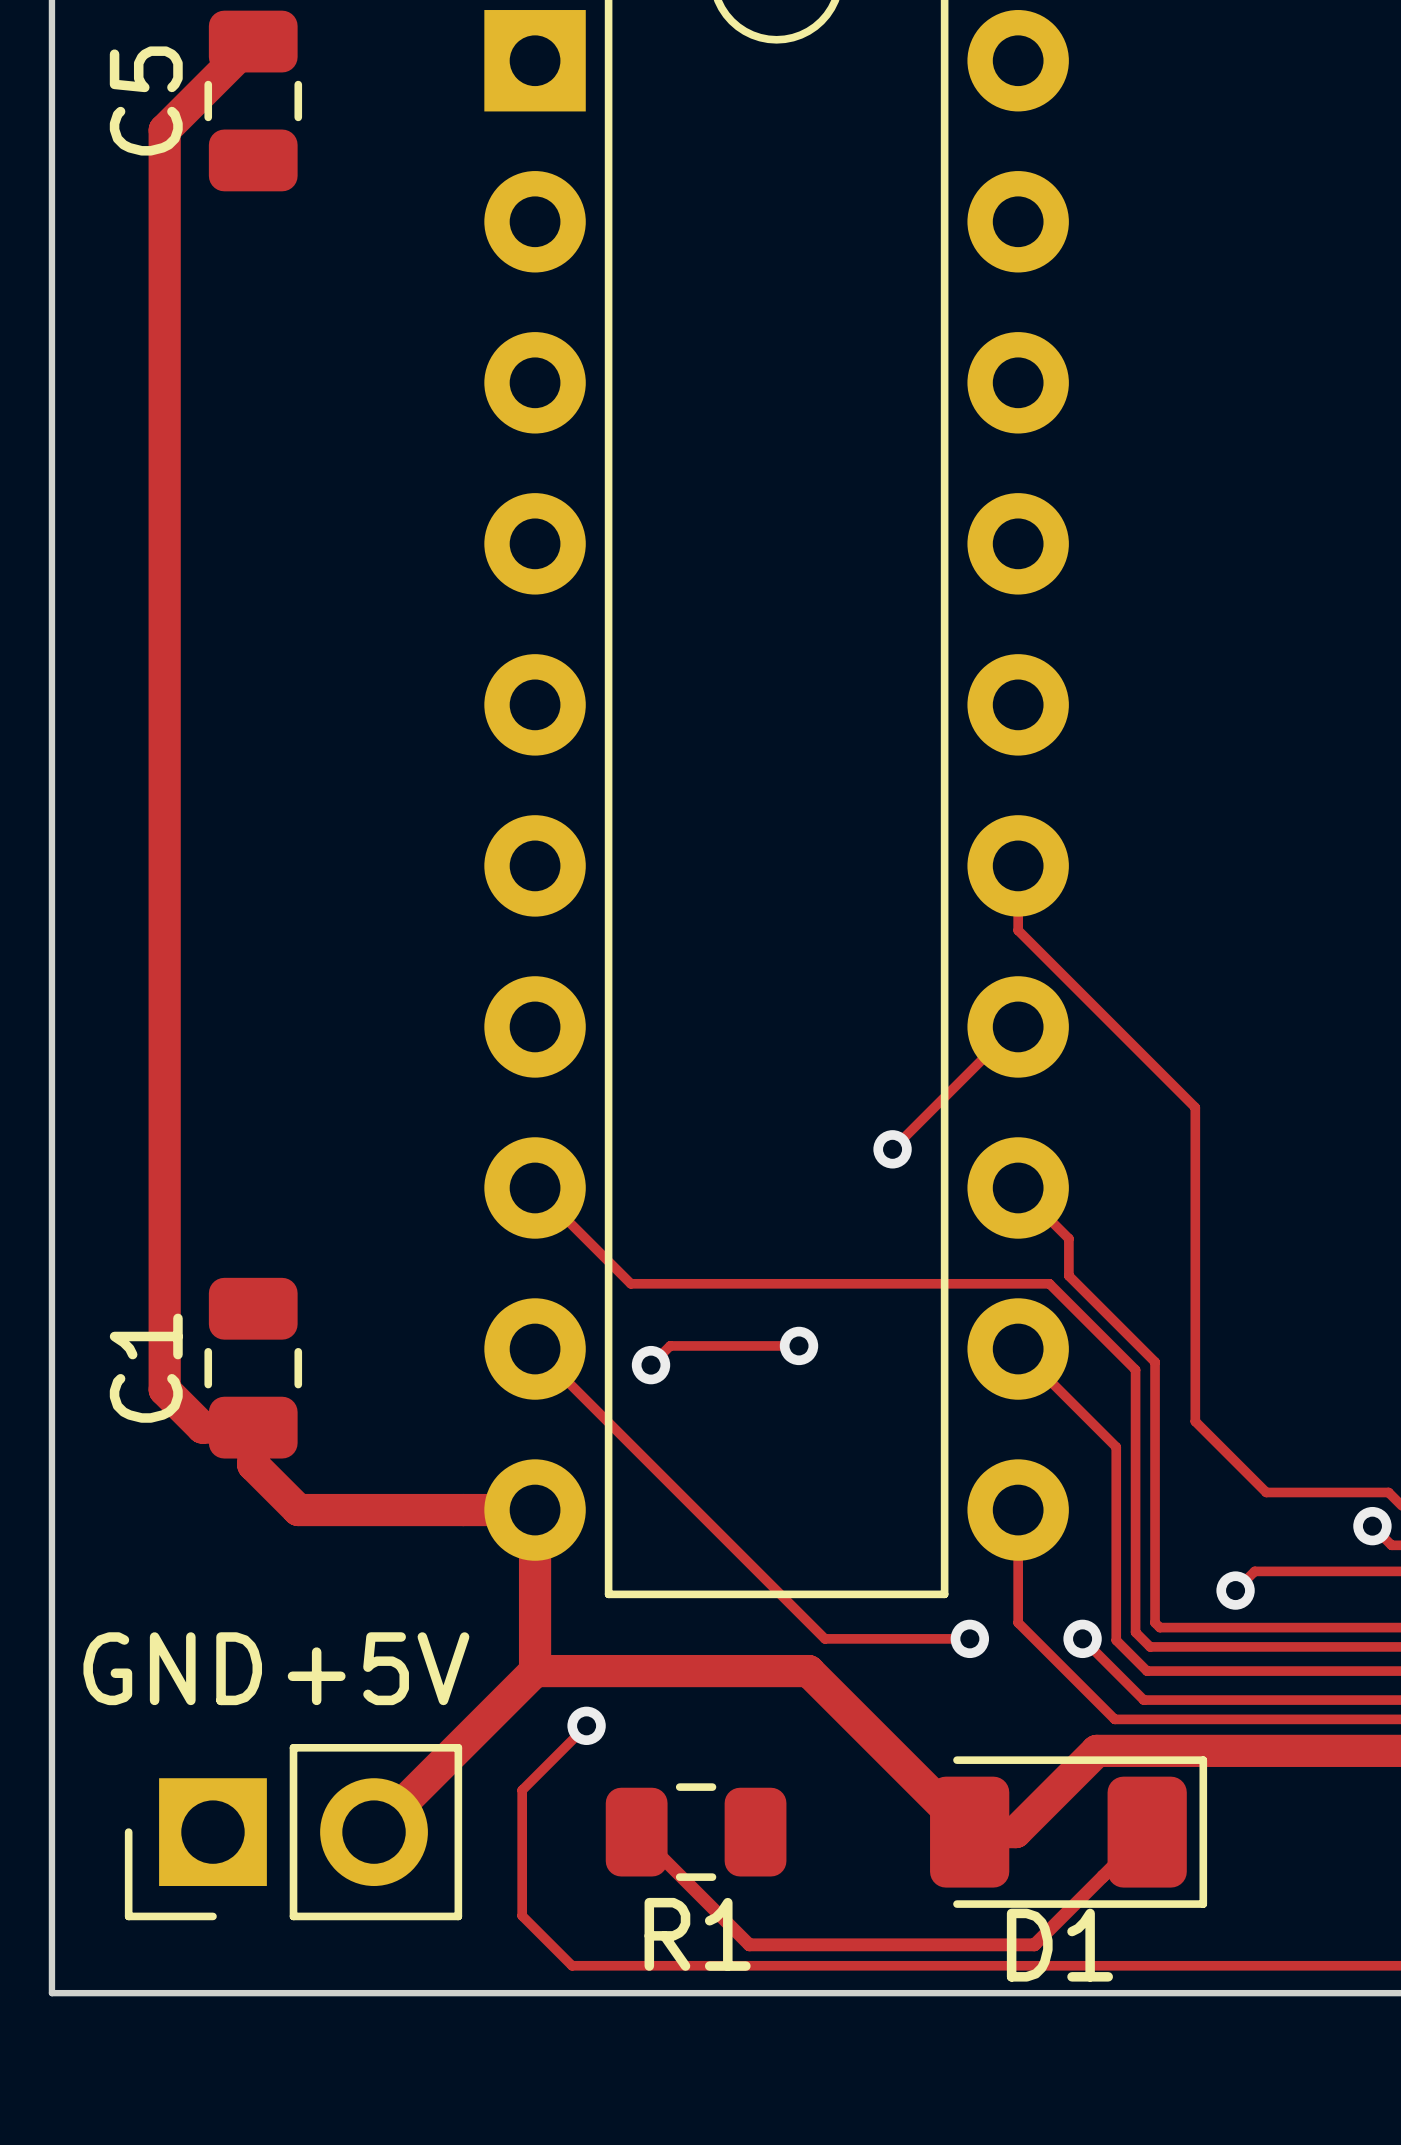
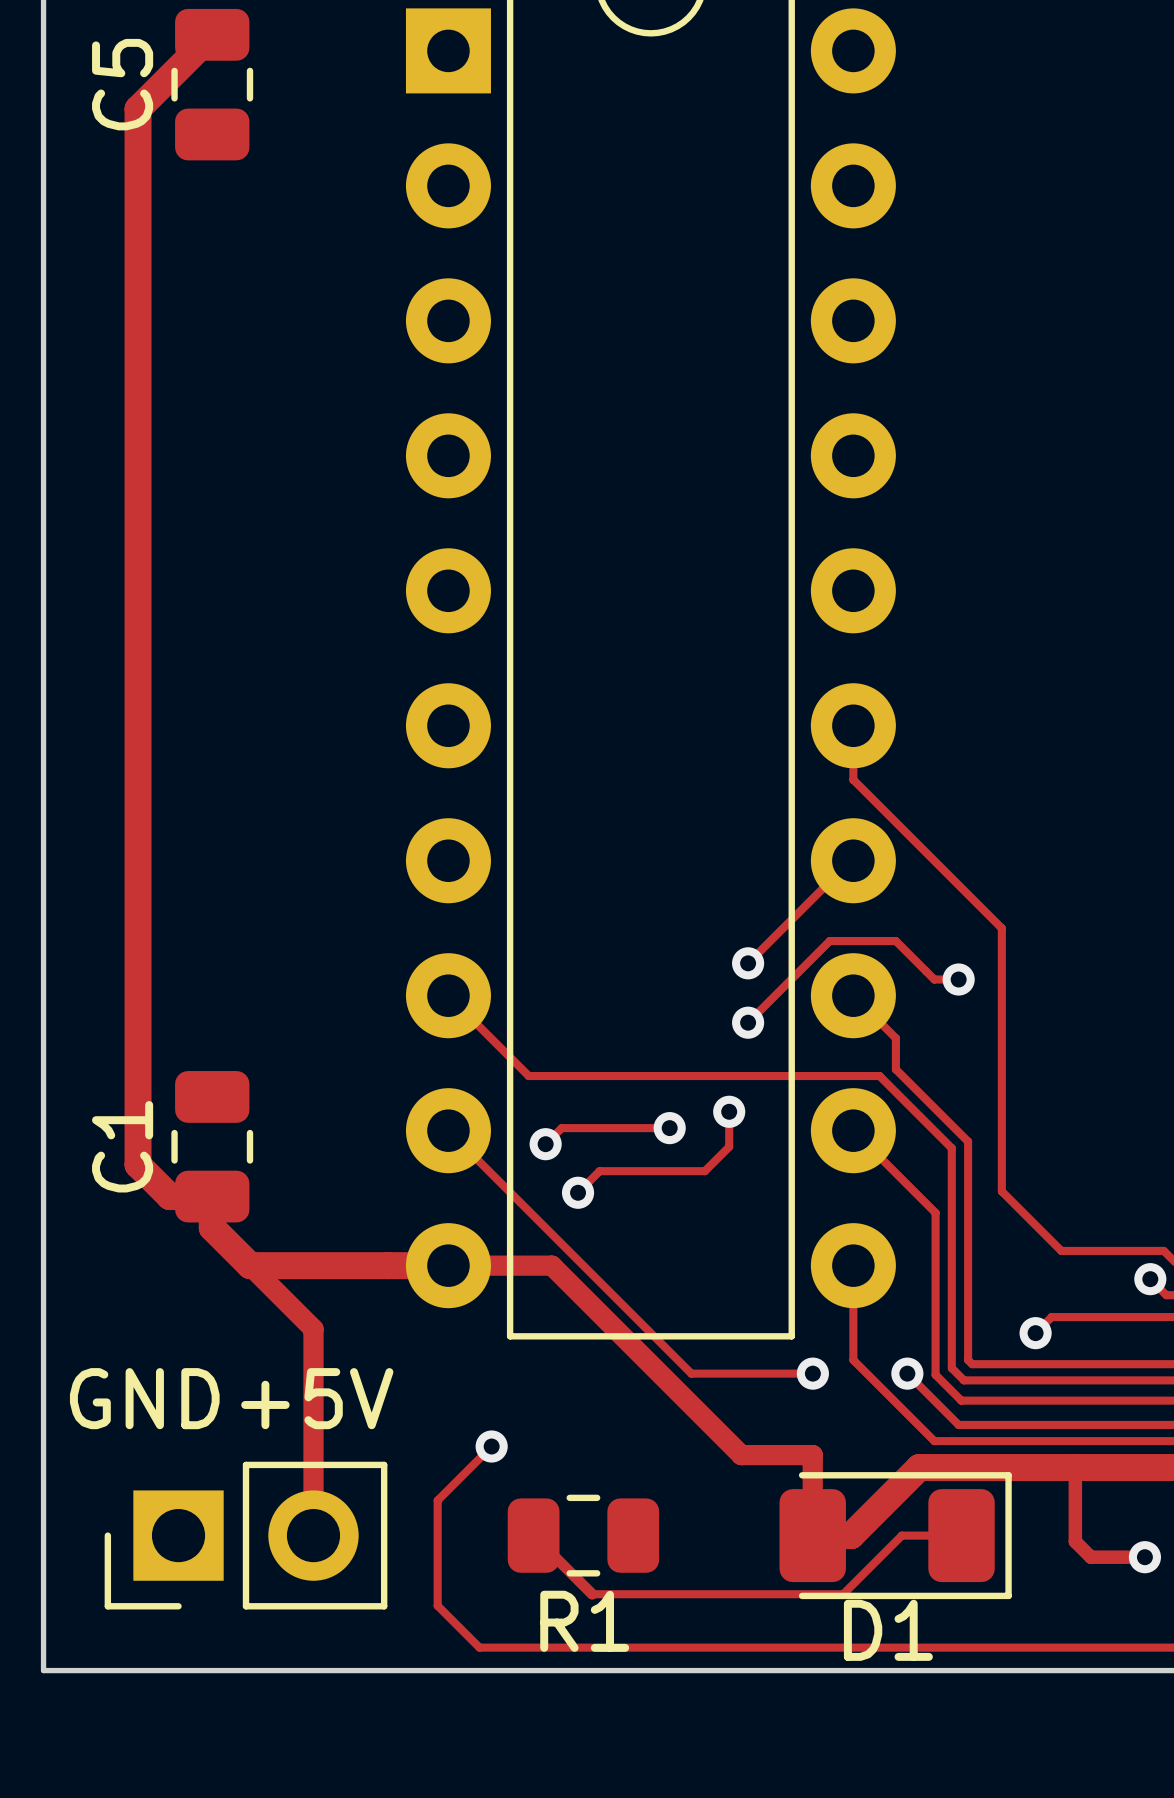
track: none -> (958, 979) (934, 979) (895, 941) (829, 941) (748, 1022)
via: none -> (958, 979)
via: none -> (748, 1022)
track: none -> (729, 1111) (729, 1146) (704, 1171) (599, 1171) (578, 1192)
via: none -> (729, 1111)
via: none -> (578, 1192)
track: (535, 1510) (535, 1671) -> none
track: (535, 1671) (808, 1671) (969, 1832) -> (448, 1265) (551, 1265) (741, 1455) (812, 1455) (812, 1535)
track: (535, 1671) (374, 1832) -> (250, 1265) (313, 1329) (313, 1535)
track: none -> (1075, 1467) (1075, 1541) (1090, 1557) (1144, 1557)
track: (1147, 1832) (1034, 1944) (749, 1944) (706, 1902) -> (961, 1535) (901, 1535) (843, 1594) (592, 1594)
via: none -> (1144, 1557)

